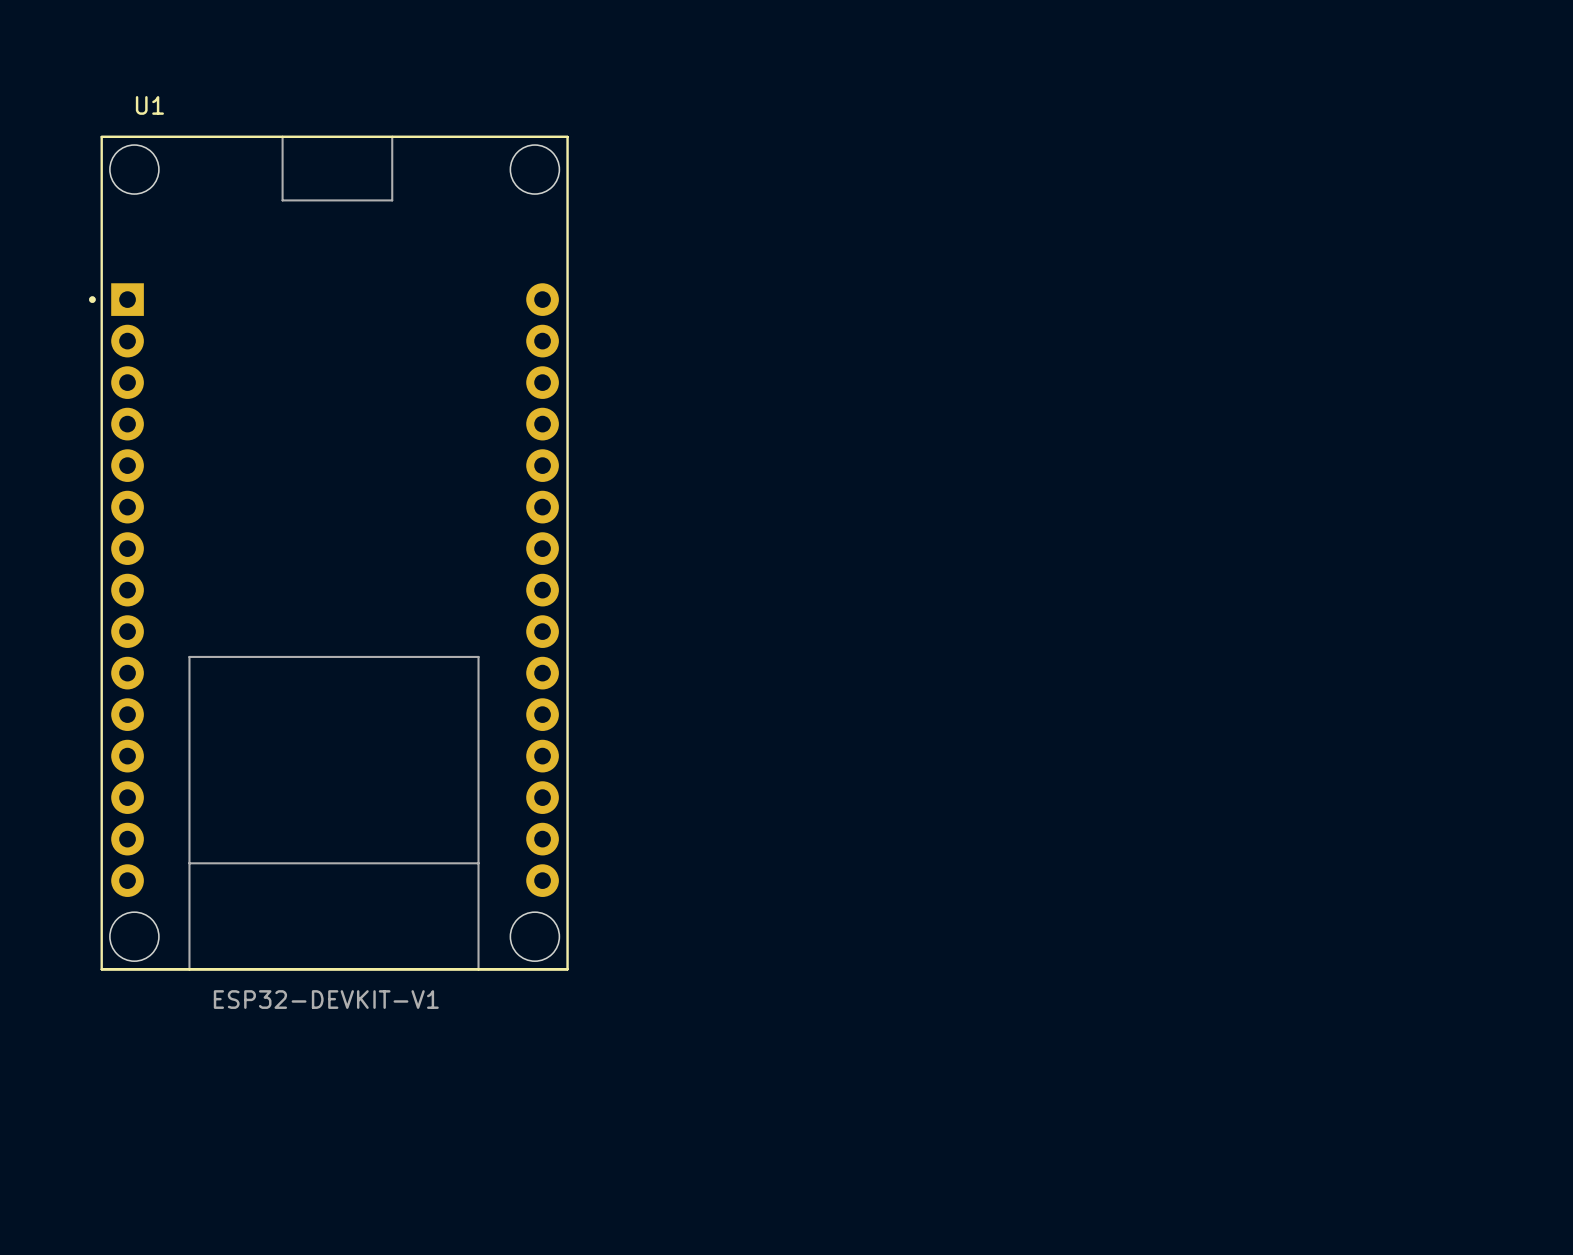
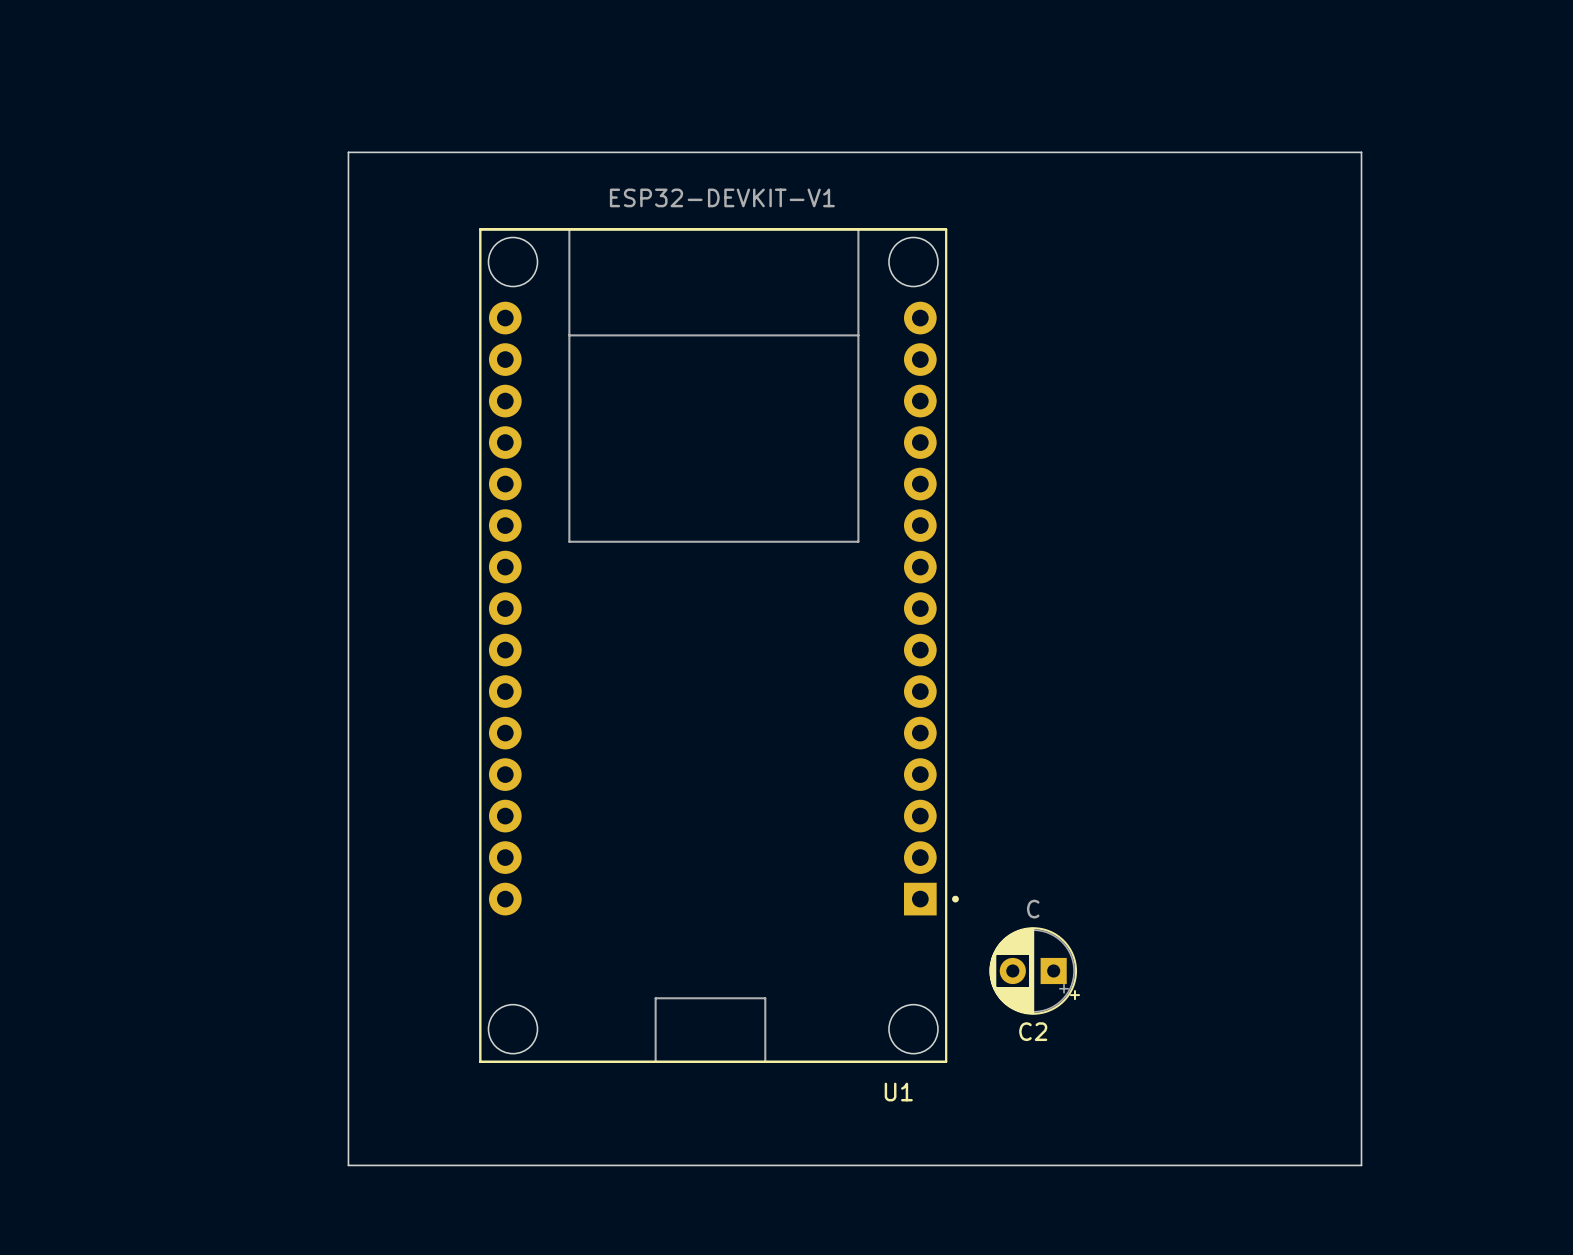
board edge: none -> (348, 152) (348, 1165) (1361, 1165) (1361, 152) (348, 152)
U1 rotation: 0° (328, 553) -> 180° (719, 645)
C2: none -> C (1034, 970)

